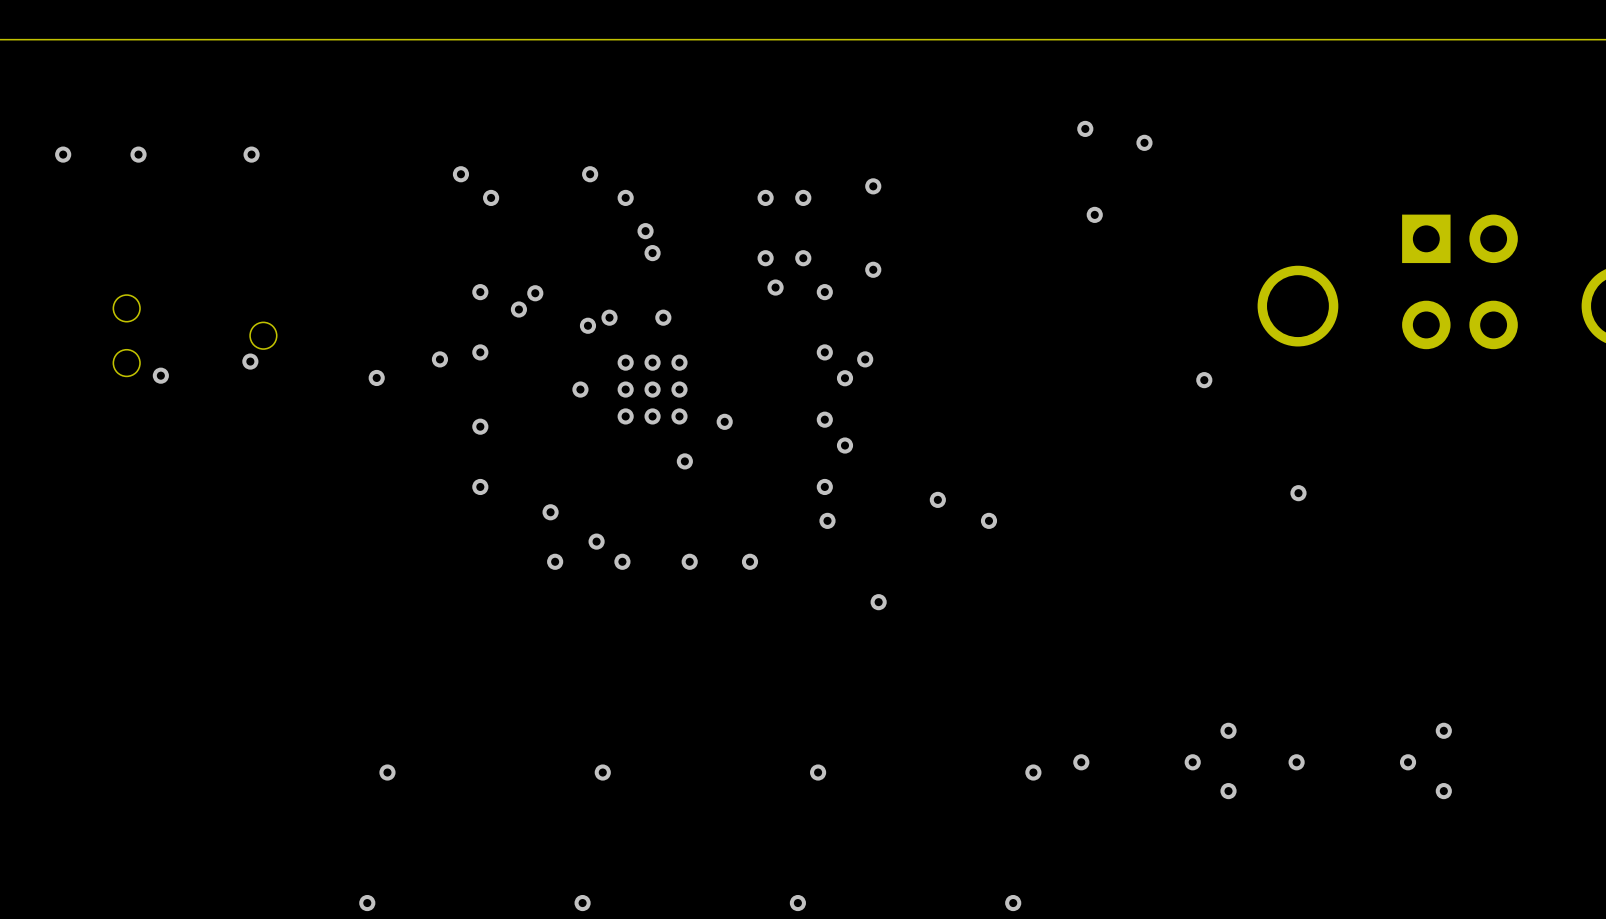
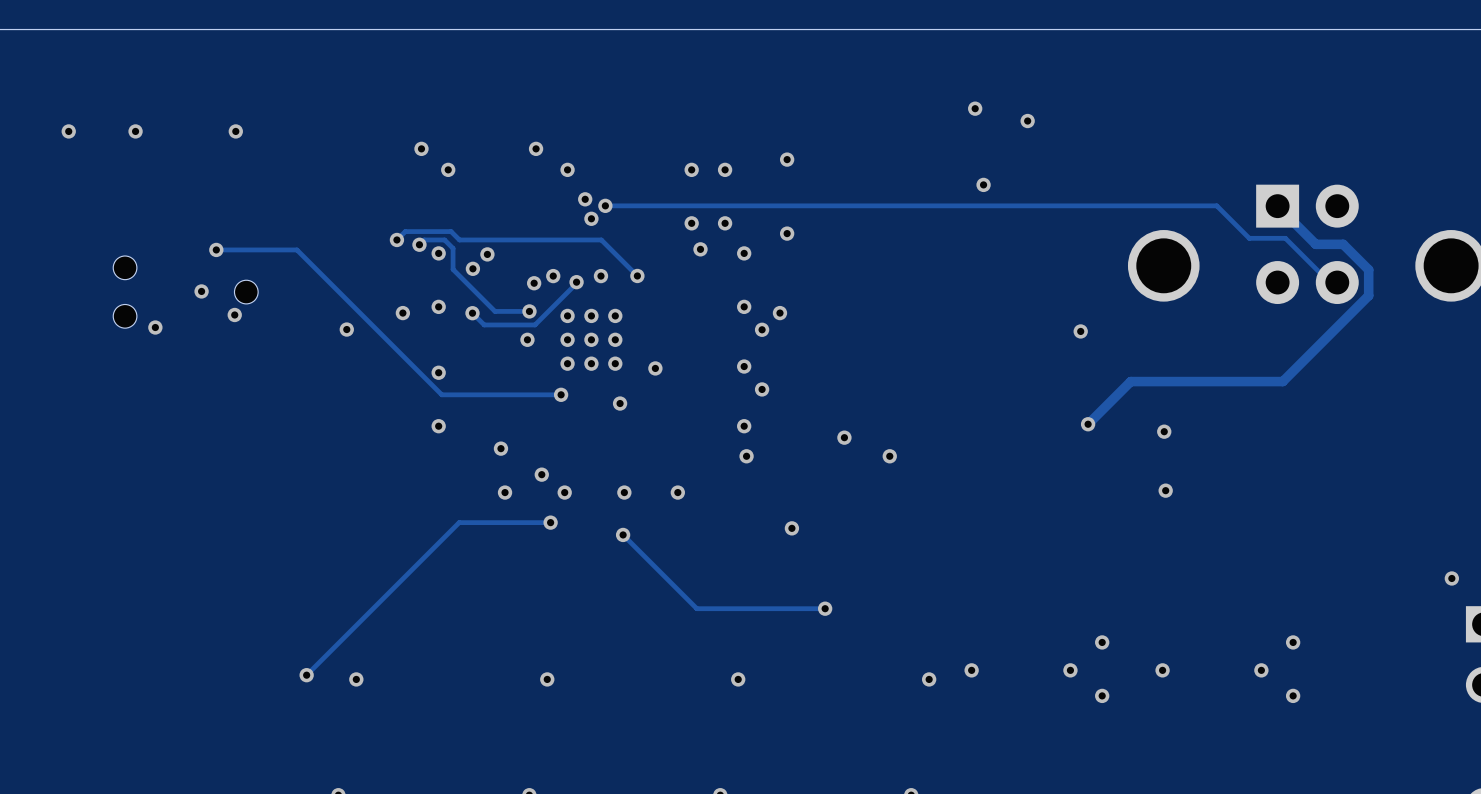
track: none -> (605, 205) (1216, 205) (1249, 238) (1285, 238) (1329, 282) (1337, 282)
via: none -> (605, 205)
track: none -> (1277, 206) (1315, 244) (1343, 244) (1368, 269) (1368, 295) (1282, 381) (1130, 381) (1088, 424)
track: none -> (396, 239) (405, 231) (451, 231) (459, 239) (601, 239) (637, 275)
via: none -> (396, 239)
track: none -> (419, 244) (424, 239) (444, 239) (453, 248) (453, 269) (495, 311) (529, 311)
via: none -> (419, 244)
track: none -> (216, 249) (296, 249) (441, 394) (561, 394)
via: none -> (216, 249)
via: none -> (637, 275)
track: none -> (576, 282) (535, 324) (484, 324) (472, 313)
via: none -> (576, 282)
via: none -> (201, 291)
via: none -> (529, 311)
via: none -> (472, 313)
via: none -> (561, 394)
via: none -> (1088, 424)
via: none -> (1165, 490)
track: none -> (550, 522) (459, 522) (306, 675)
via: none -> (550, 522)
track: none -> (623, 534) (696, 608) (825, 608)
via: none -> (623, 534)
via: none -> (825, 608)
via: none -> (306, 675)

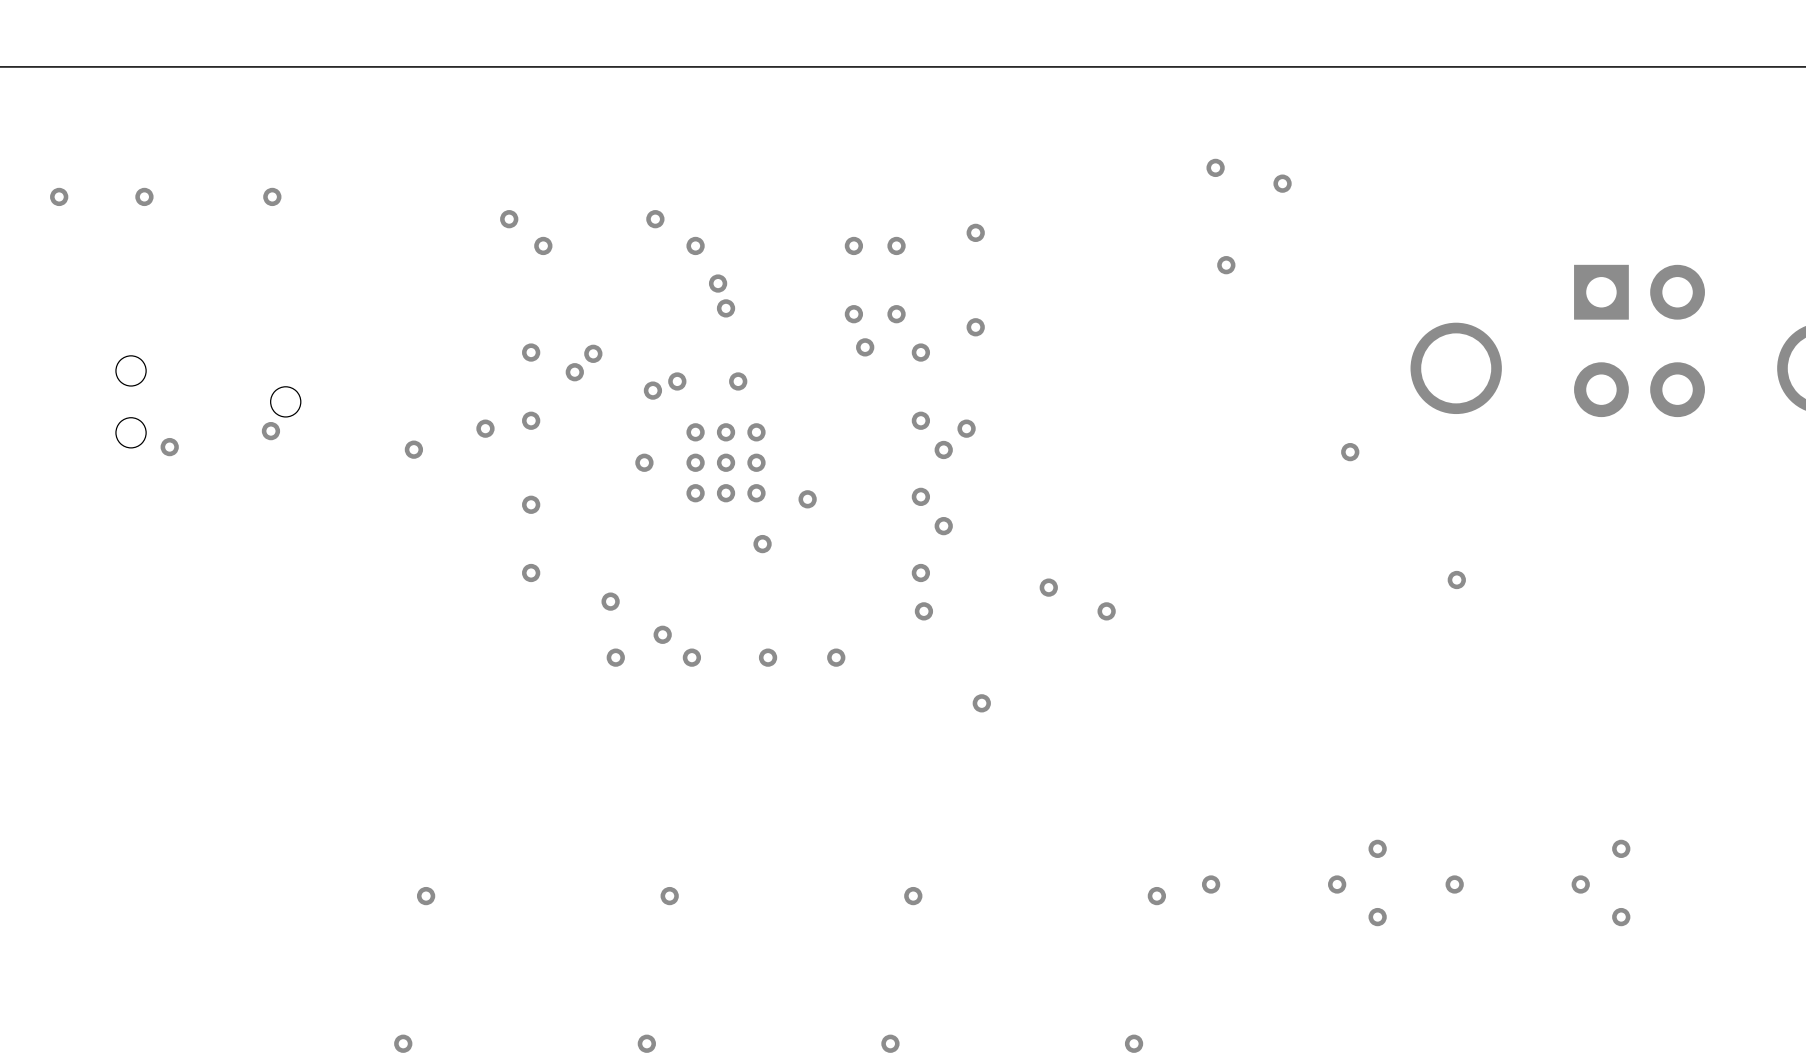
track: (605, 205) (1216, 205) (1249, 238) (1285, 238) (1329, 282) (1337, 282) -> none
via: (605, 205) -> none
track: (1277, 206) (1315, 244) (1343, 244) (1368, 269) (1368, 295) (1282, 381) (1130, 381) (1088, 424) -> none
track: (396, 239) (405, 231) (451, 231) (459, 239) (601, 239) (637, 275) -> none
via: (396, 239) -> none
track: (419, 244) (424, 239) (444, 239) (453, 248) (453, 269) (495, 311) (529, 311) -> none
via: (419, 244) -> none
track: (216, 249) (296, 249) (441, 394) (561, 394) -> none
via: (216, 249) -> none
via: (637, 275) -> none
track: (576, 282) (535, 324) (484, 324) (472, 313) -> none
via: (576, 282) -> none
via: (201, 291) -> none
via: (529, 311) -> none
via: (472, 313) -> none
via: (561, 394) -> none
via: (1088, 424) -> none
via: (1165, 490) -> none
track: (550, 522) (459, 522) (306, 675) -> none
via: (550, 522) -> none
track: (623, 534) (696, 608) (825, 608) -> none
via: (623, 534) -> none
via: (825, 608) -> none
via: (306, 675) -> none

